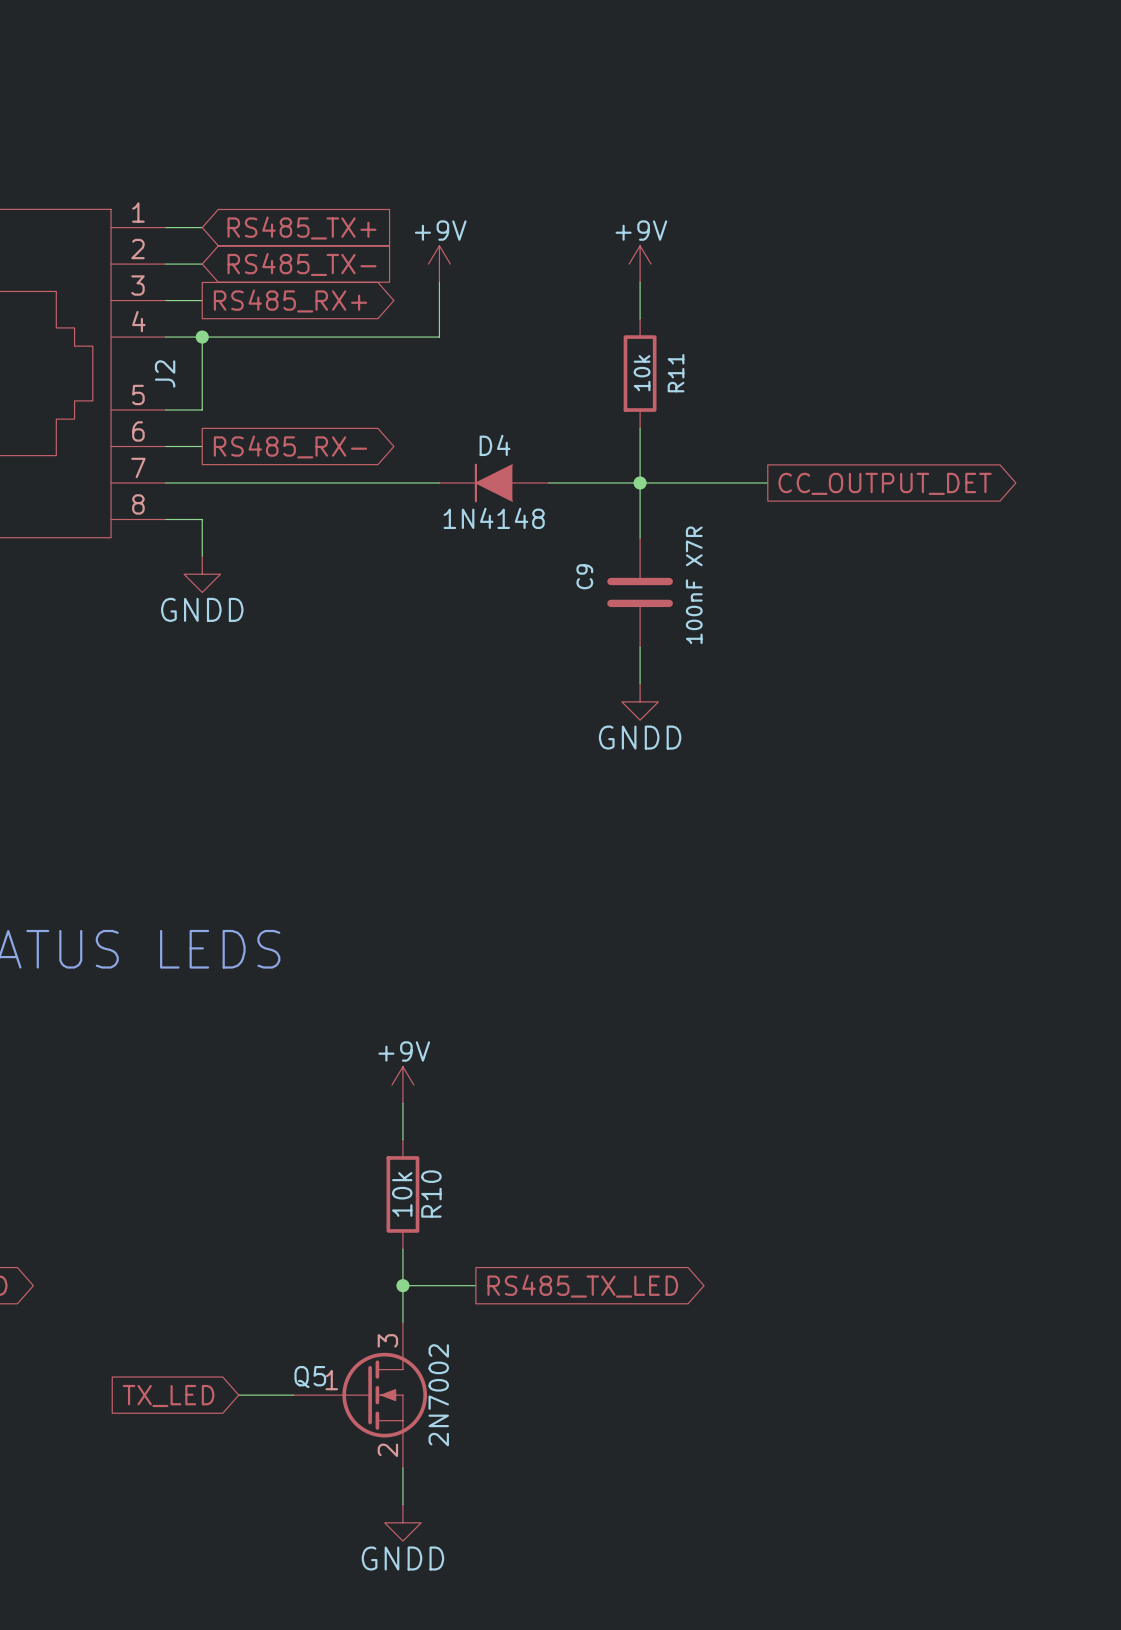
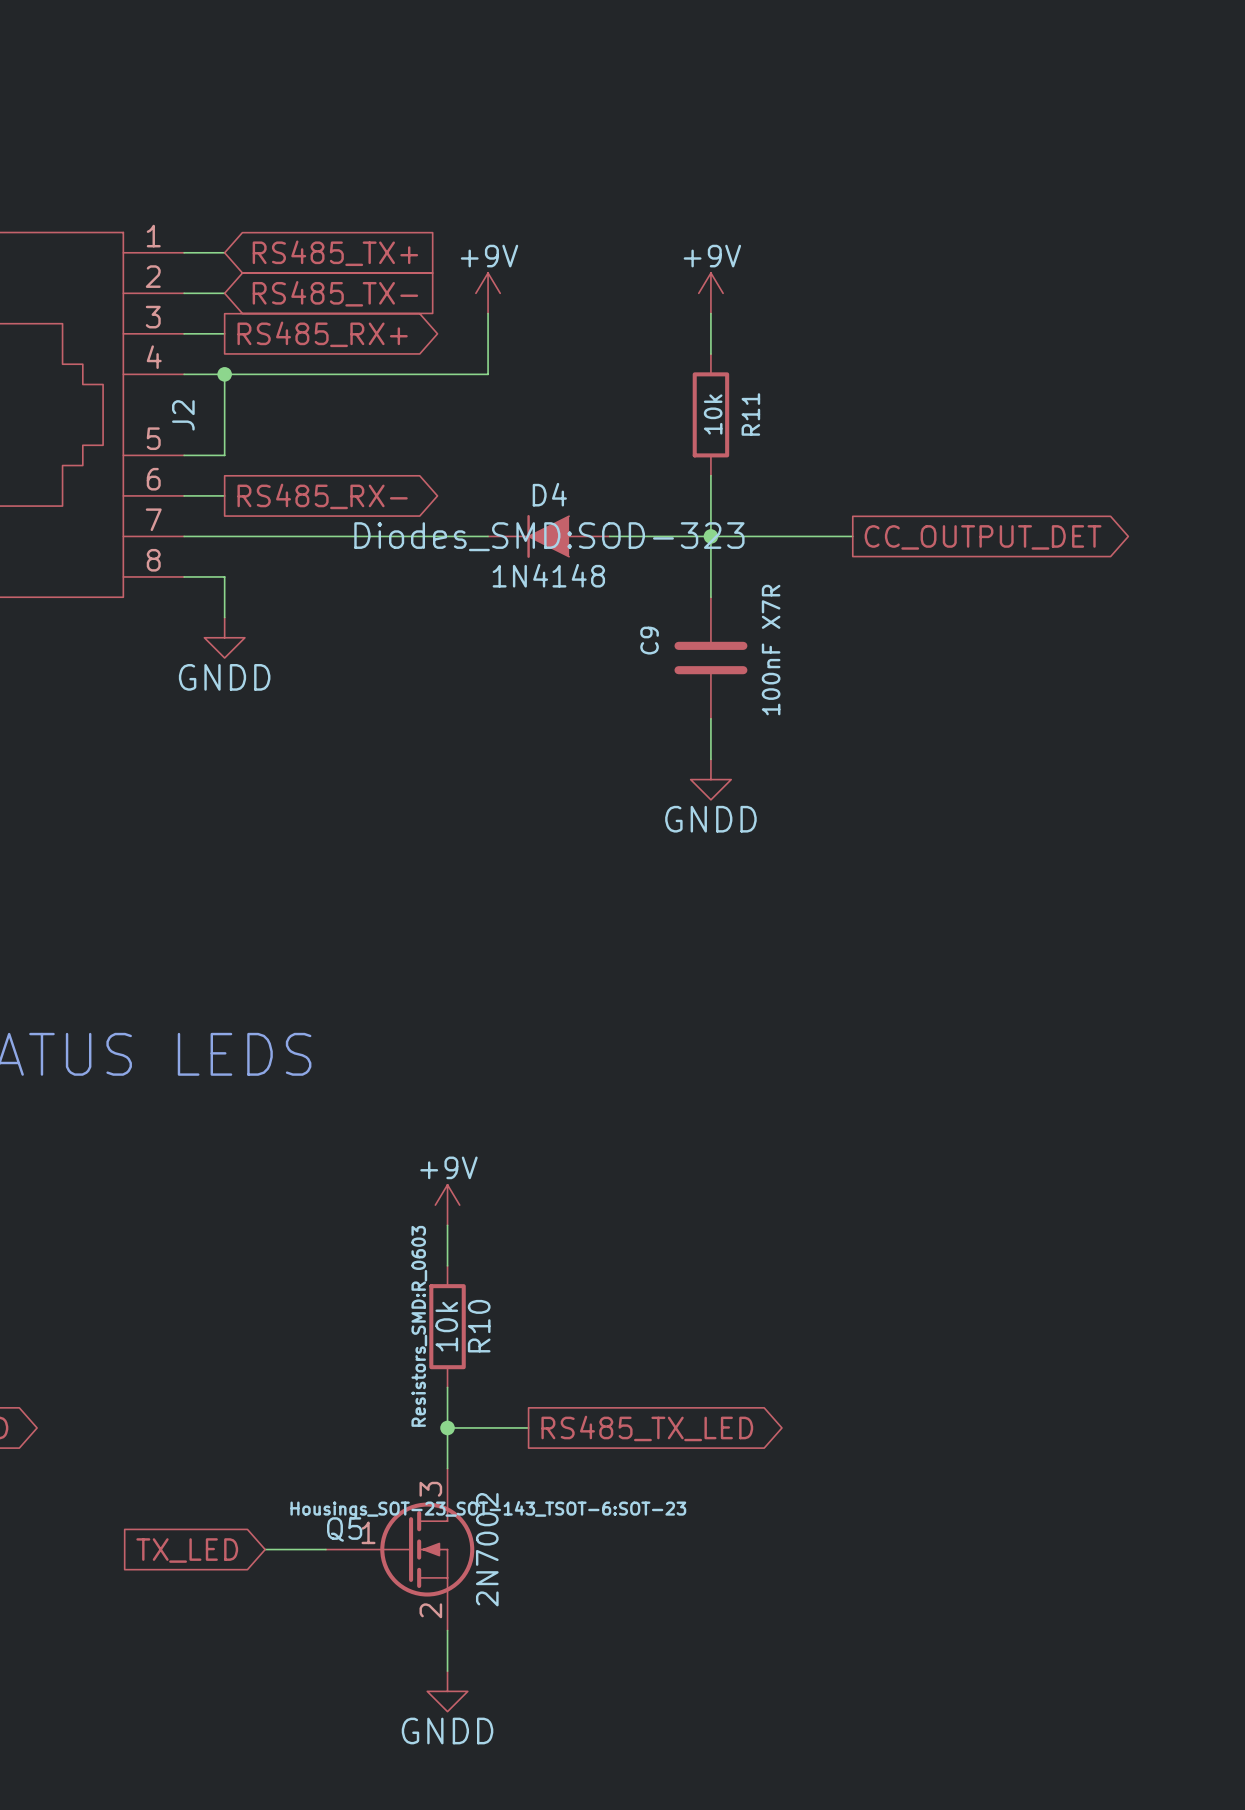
D4 text: none -> Diodes_SMD:SOD-323 (549, 536)
R10 text: none -> Resistors_SMD:R_0603 (419, 1326)
Q5 text: none -> Housings_SOT-23_SOT-143_TSOT-6:SOT-23 (488, 1510)

